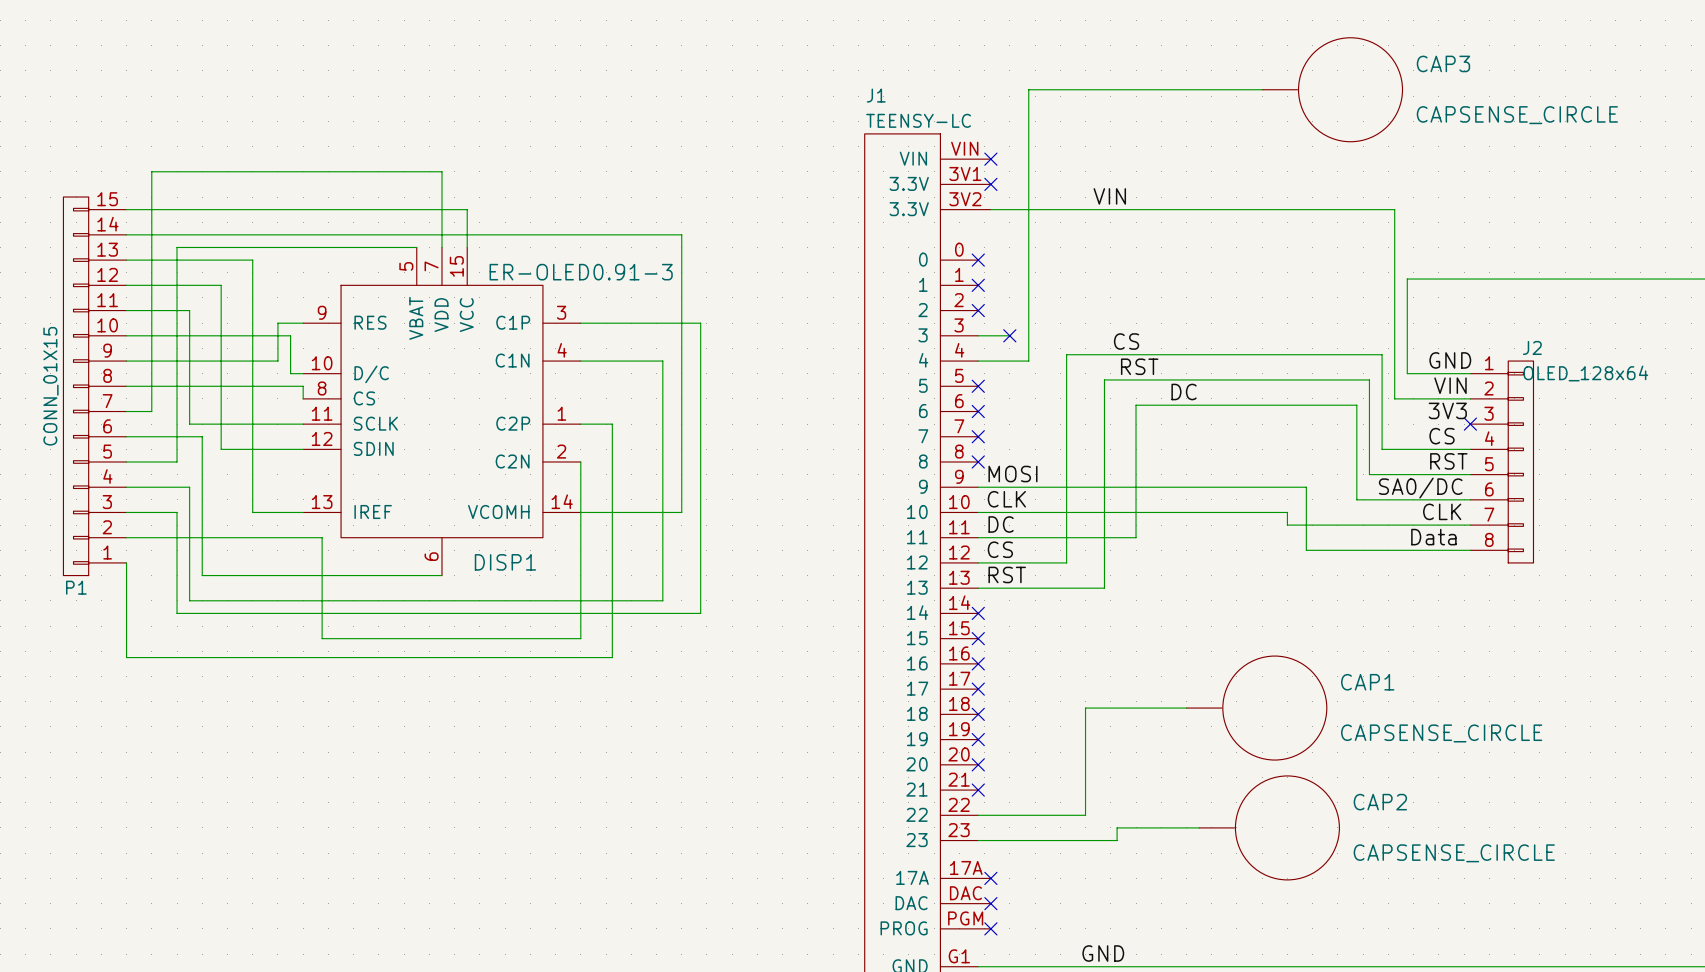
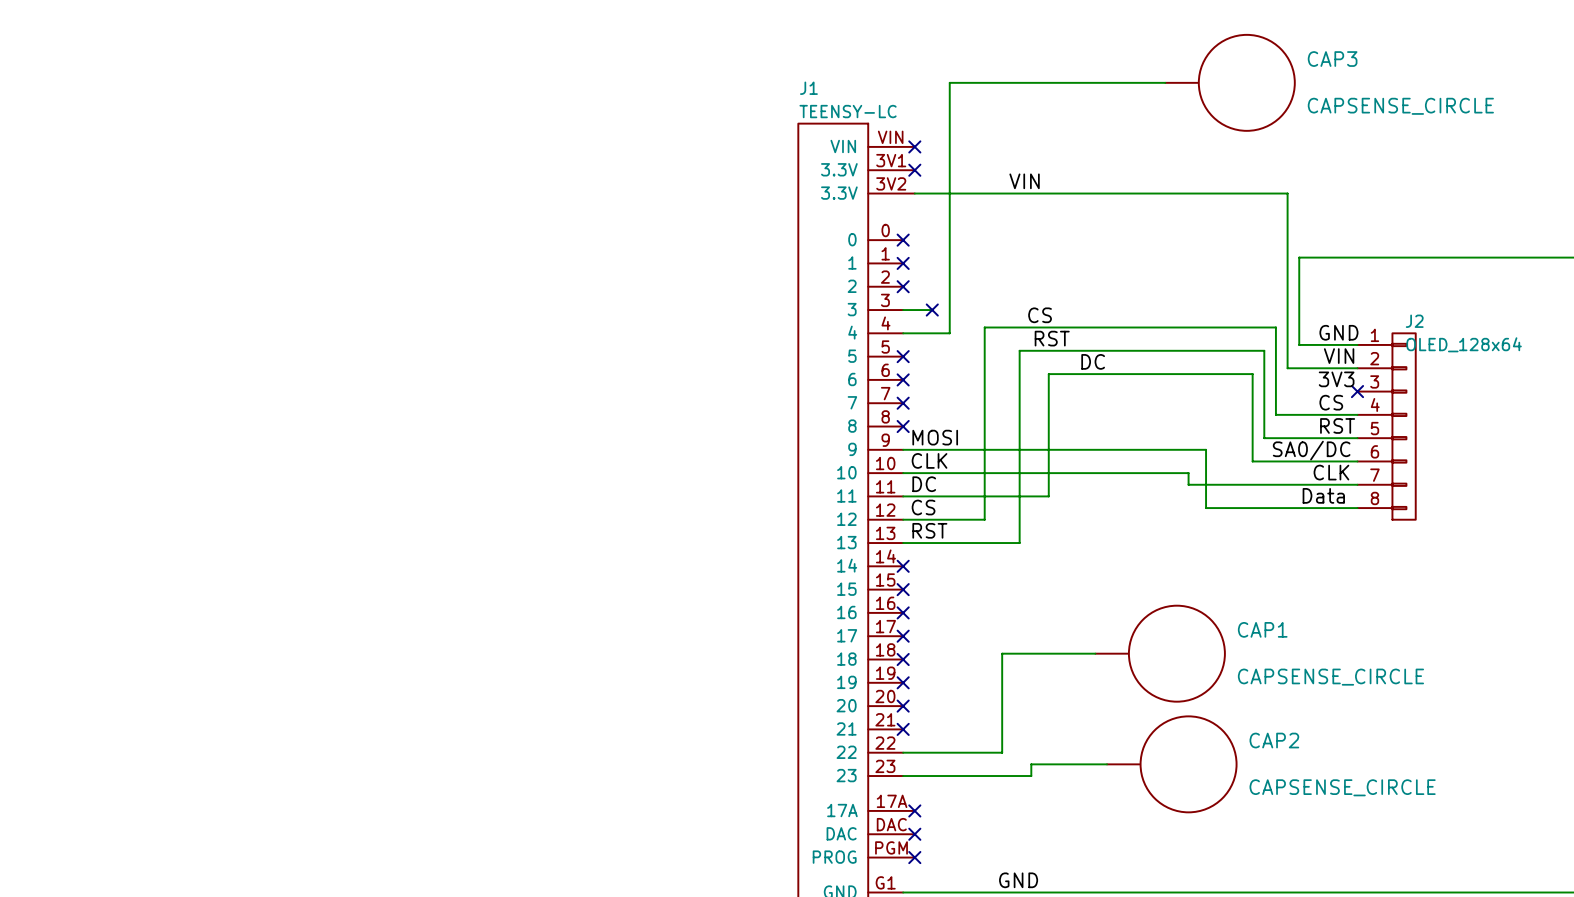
wire: (126, 209) (467, 209) (467, 247) -> none
wire: (126, 234) (681, 234) (681, 512) (580, 512) -> none
wire: (416, 247) (177, 247) (177, 461) (126, 461) -> none
wire: (441, 247) (441, 171) (151, 171) (151, 411) (126, 411) -> none
wire: (126, 260) (252, 260) (252, 512) (303, 512) -> none
wire: (126, 285) (221, 285) (221, 449) (303, 449) -> none
wire: (126, 310) (189, 310) (189, 424) (303, 424) -> none
wire: (303, 323) (277, 323) (277, 361) (126, 361) -> none
wire: (580, 323) (700, 323) (700, 613) (177, 613) (177, 512) (126, 512) -> none
wire: (126, 335) (290, 335) (290, 373) (303, 373) -> none
wire: (580, 361) (662, 361) (662, 600) (189, 600) (189, 487) (126, 487) -> none
P1: CONN_01X15 (94, 386) -> none
wire: (126, 386) (303, 386) (303, 398) -> none
DISP1: ER-OLED0.91-3 (441, 411) -> none
wire: (580, 424) (612, 424) (612, 657) (126, 657) (126, 562) -> none
wire: (126, 436) (202, 436) (202, 575) (441, 575) -> none
wire: (580, 461) (580, 638) (322, 638) (322, 537) (126, 537) -> none

